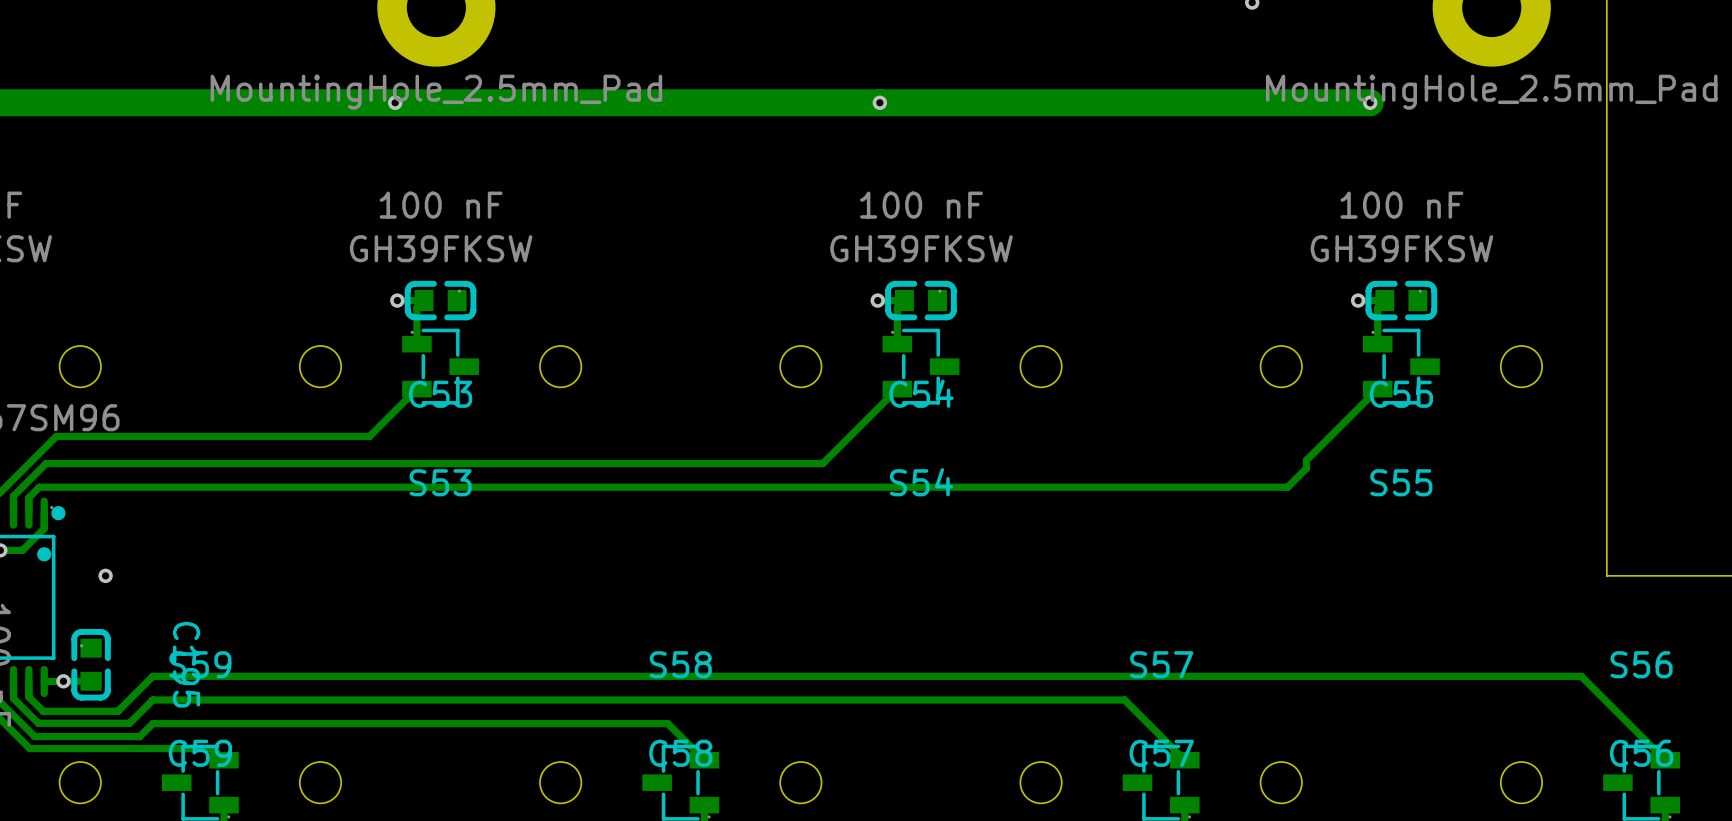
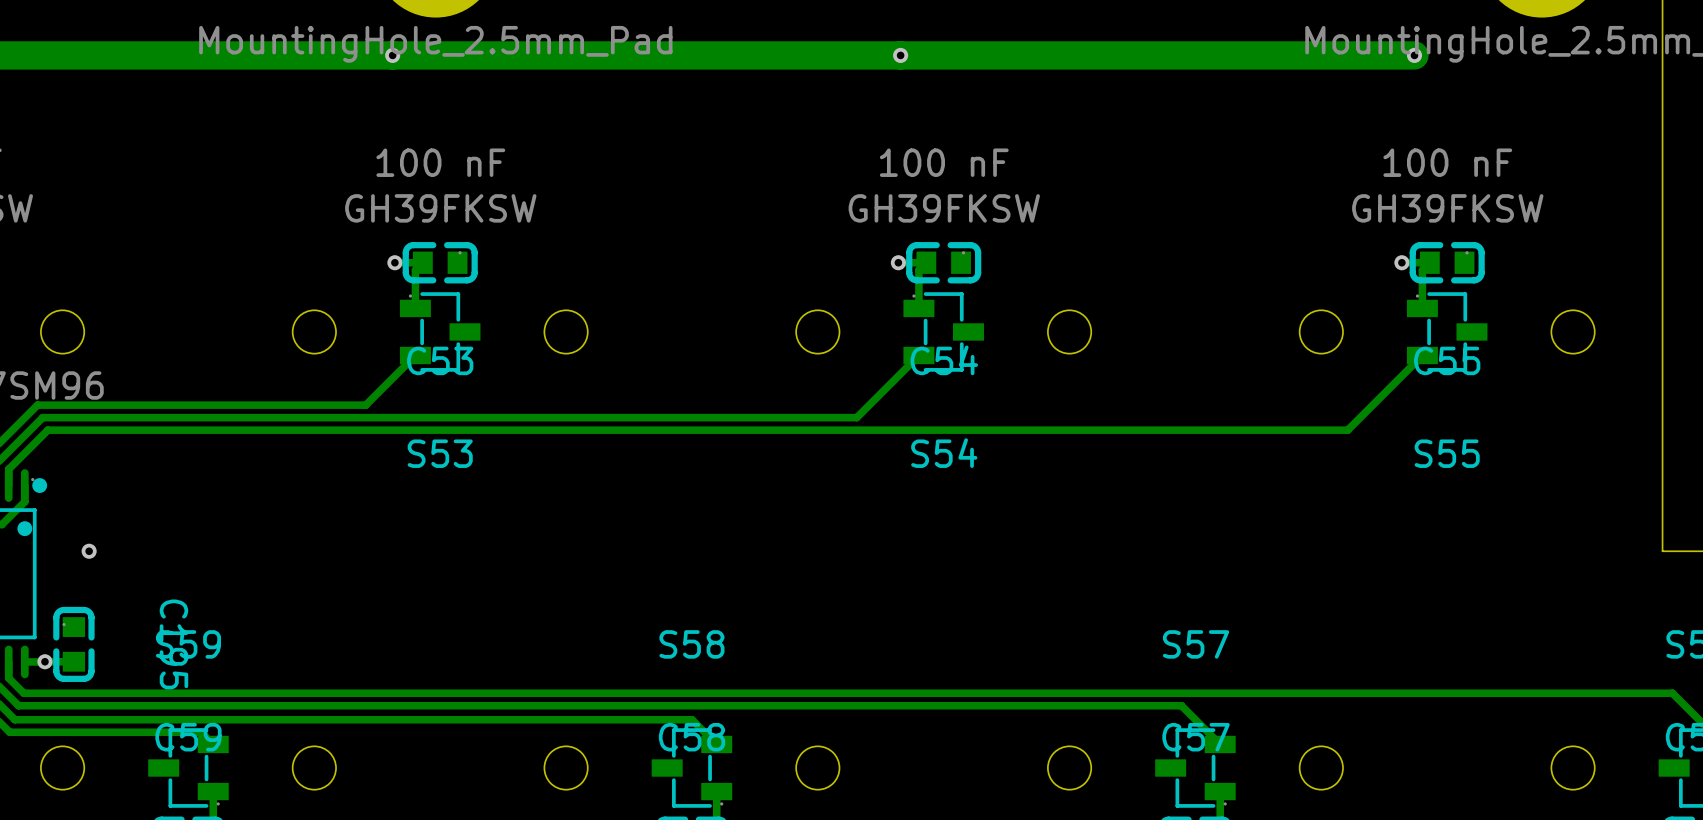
track: (838, 448) (822, 463) (46, 463) -> (856, 417) (42, 417) (26, 433)
track: (1306, 460) (1306, 468) (1287, 487) (39, 487) -> (1347, 430) (47, 430) (19, 458)
track: (1616, 711) (1581, 676) (152, 676) (117, 711) -> (1672, 693) (102, 693)
track: (1147, 723) (1124, 699) (152, 699) (129, 723) -> (1181, 705) (114, 705)
track: (680, 736) (667, 723) (152, 723) (139, 736) -> (692, 719) (125, 719)

